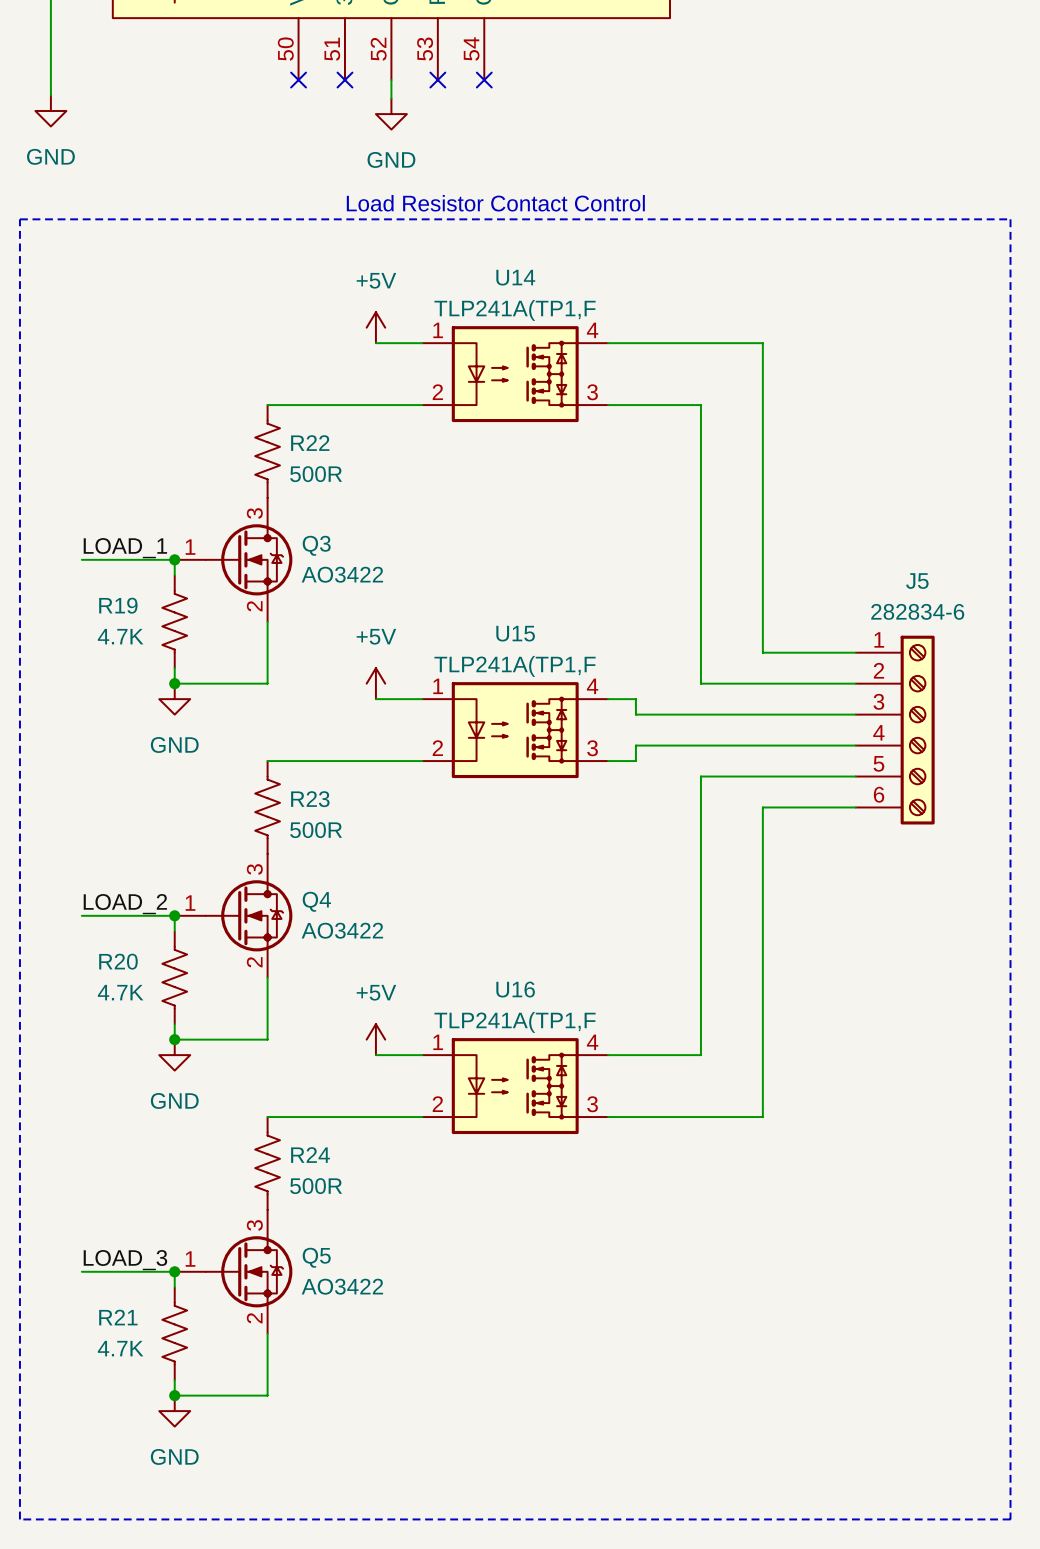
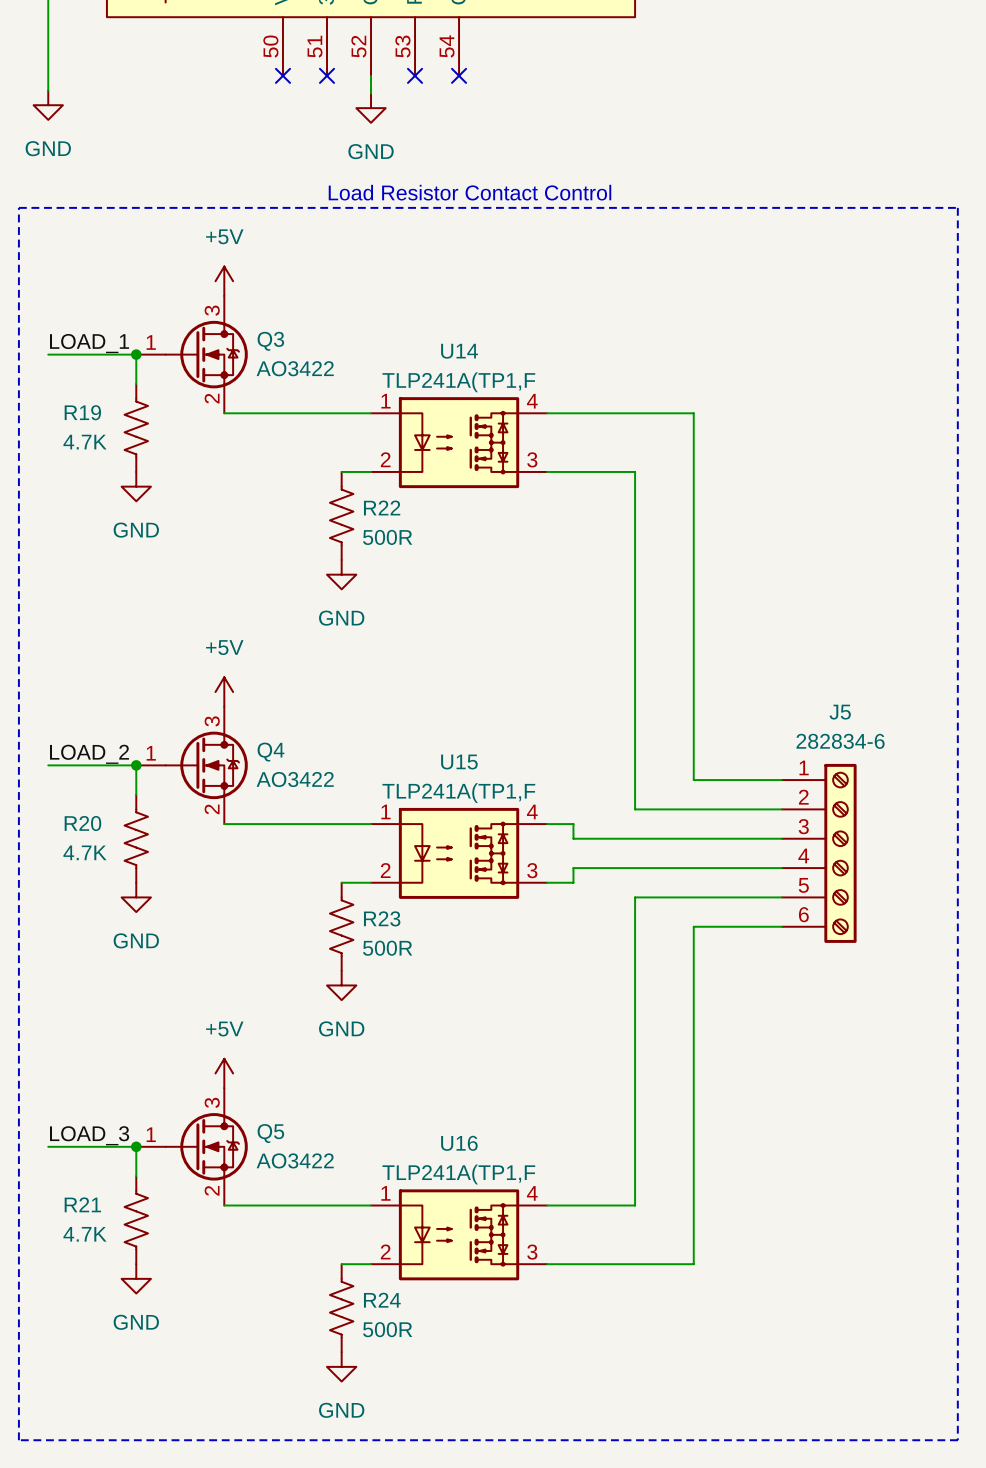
power symbol position: +5V (375, 327) -> +5V (224, 281)
wire: (375, 343) (422, 343) -> none
wire: (608, 343) (762, 343) (762, 652) (855, 652) -> none
wire: none -> (48, 354) (136, 354) (136, 383)
junction: none -> (136, 354)
U14 position: (515, 374) -> (459, 442)
wire: (267, 405) (422, 405) -> (224, 413) (371, 413)
wire: (608, 405) (700, 405) (700, 683) (855, 683) -> none
wire: none -> (547, 413) (693, 413) (693, 780) (781, 780)
R22 position: (267, 451) -> (341, 515)
wire: none -> (341, 471) (371, 471)
wire: none -> (547, 471) (635, 471) (635, 809) (781, 809)
power symbol: none -> GND (136, 486)
label position: LOAD_1 (125, 548) -> LOAD_1 (89, 343)
wire: (81, 559) (174, 559) (174, 575) -> none
junction: (174, 559) -> none
Q3 position: (233, 559) -> (192, 354)
power symbol: none -> GND (341, 574)
R19 position: (174, 621) -> (136, 427)
wire: (267, 621) (267, 683) (174, 683) (174, 668) -> none
junction: (174, 683) -> none
power symbol position: +5V (375, 683) -> +5V (224, 692)
power symbol: GND (174, 699) -> none
wire: (375, 699) (422, 699) -> none
wire: (608, 699) (635, 699) (635, 714) (855, 714) -> (547, 824) (573, 824) (573, 838) (781, 838)
U15 position: (515, 730) -> (459, 853)
J5 position: (895, 730) -> (819, 853)
wire: (855, 745) (635, 745) (635, 761) (608, 761) -> (781, 868) (573, 868) (573, 882) (547, 882)
wire: (267, 761) (422, 761) -> (224, 824) (371, 824)
wire: (855, 776) (700, 776) (700, 1055) (608, 1055) -> none
wire: none -> (48, 765) (136, 765) (136, 794)
junction: none -> (136, 765)
R23 position: (267, 807) -> (341, 926)
wire: (855, 807) (762, 807) (762, 1117) (608, 1117) -> none
label position: LOAD_2 (125, 904) -> LOAD_2 (89, 754)
wire: (81, 915) (174, 915) (174, 931) -> none
junction: (174, 915) -> none
Q4 position: (233, 915) -> (192, 765)
wire: none -> (341, 882) (371, 882)
power symbol: none -> GND (136, 897)
wire: none -> (781, 897) (635, 897) (635, 1205) (547, 1205)
R20 position: (174, 977) -> (136, 838)
wire: (267, 977) (267, 1039) (174, 1039) (174, 1024) -> none
wire: none -> (781, 926) (693, 926) (693, 1264) (547, 1264)
junction: (174, 1039) -> none
power symbol: none -> GND (341, 985)
power symbol position: +5V (375, 1039) -> +5V (224, 1073)
power symbol: GND (174, 1055) -> none
wire: (375, 1055) (422, 1055) -> none
U16 position: (515, 1086) -> (459, 1234)
wire: (267, 1117) (422, 1117) -> (224, 1205) (371, 1205)
R24 position: (267, 1163) -> (341, 1308)
wire: none -> (48, 1146) (136, 1146) (136, 1176)
label position: LOAD_3 (125, 1260) -> LOAD_3 (89, 1135)
wire: (81, 1271) (174, 1271) (174, 1287) -> none
junction position: (174, 1271) -> (136, 1146)
Q5 position: (233, 1271) -> (192, 1146)
R21 position: (174, 1333) -> (136, 1220)
wire: (267, 1333) (267, 1395) (174, 1395) (174, 1380) -> none
wire: none -> (341, 1264) (371, 1264)
junction: (174, 1395) -> none
power symbol position: GND (174, 1411) -> GND (136, 1278)
power symbol: none -> GND (341, 1366)

